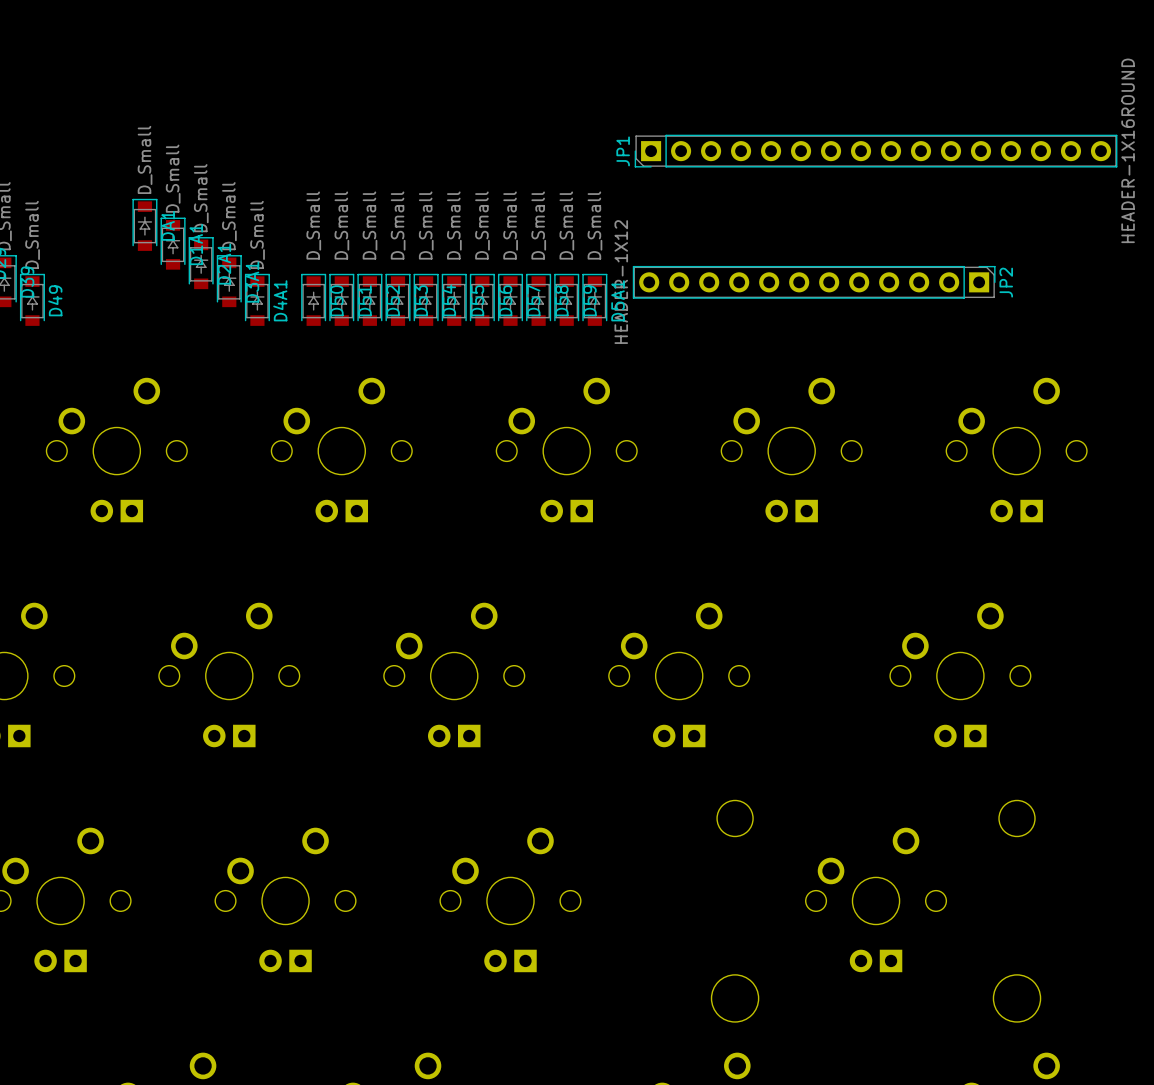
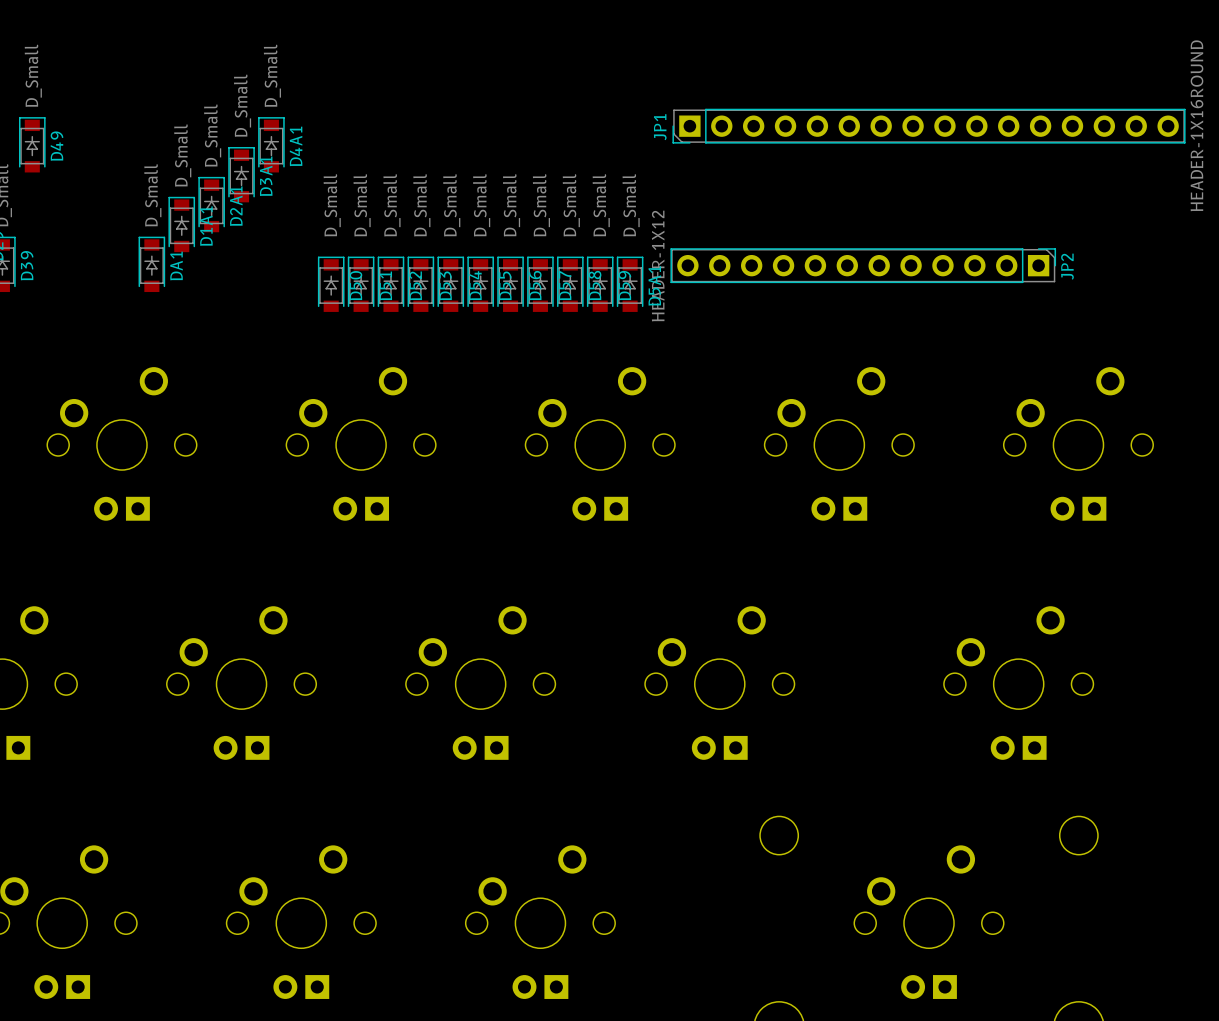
DA1 position: (144, 224) -> (151, 264)
D2A1 position: (201, 263) -> (211, 204)
D3A1 position: (229, 281) -> (241, 174)
D49 position: (32, 299) -> (32, 144)
D4A1 position: (257, 299) -> (271, 144)

